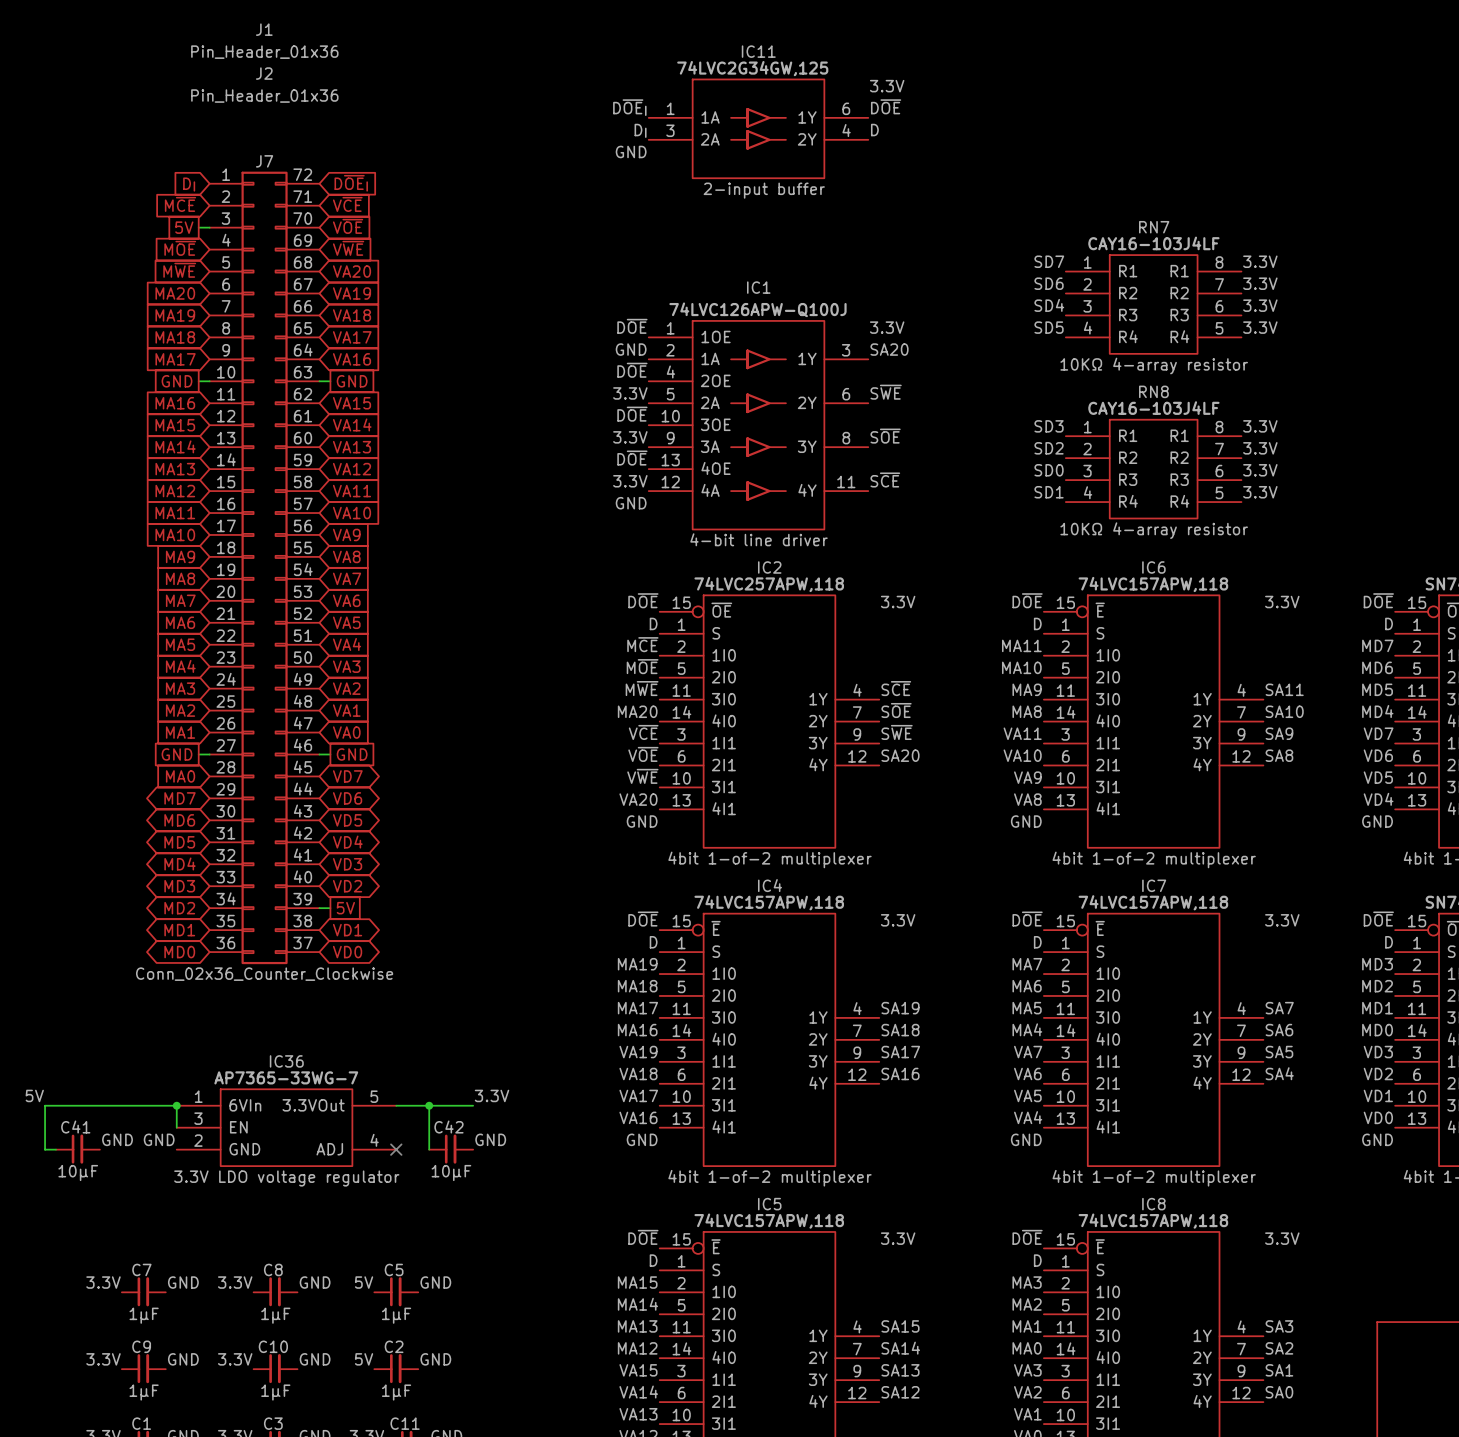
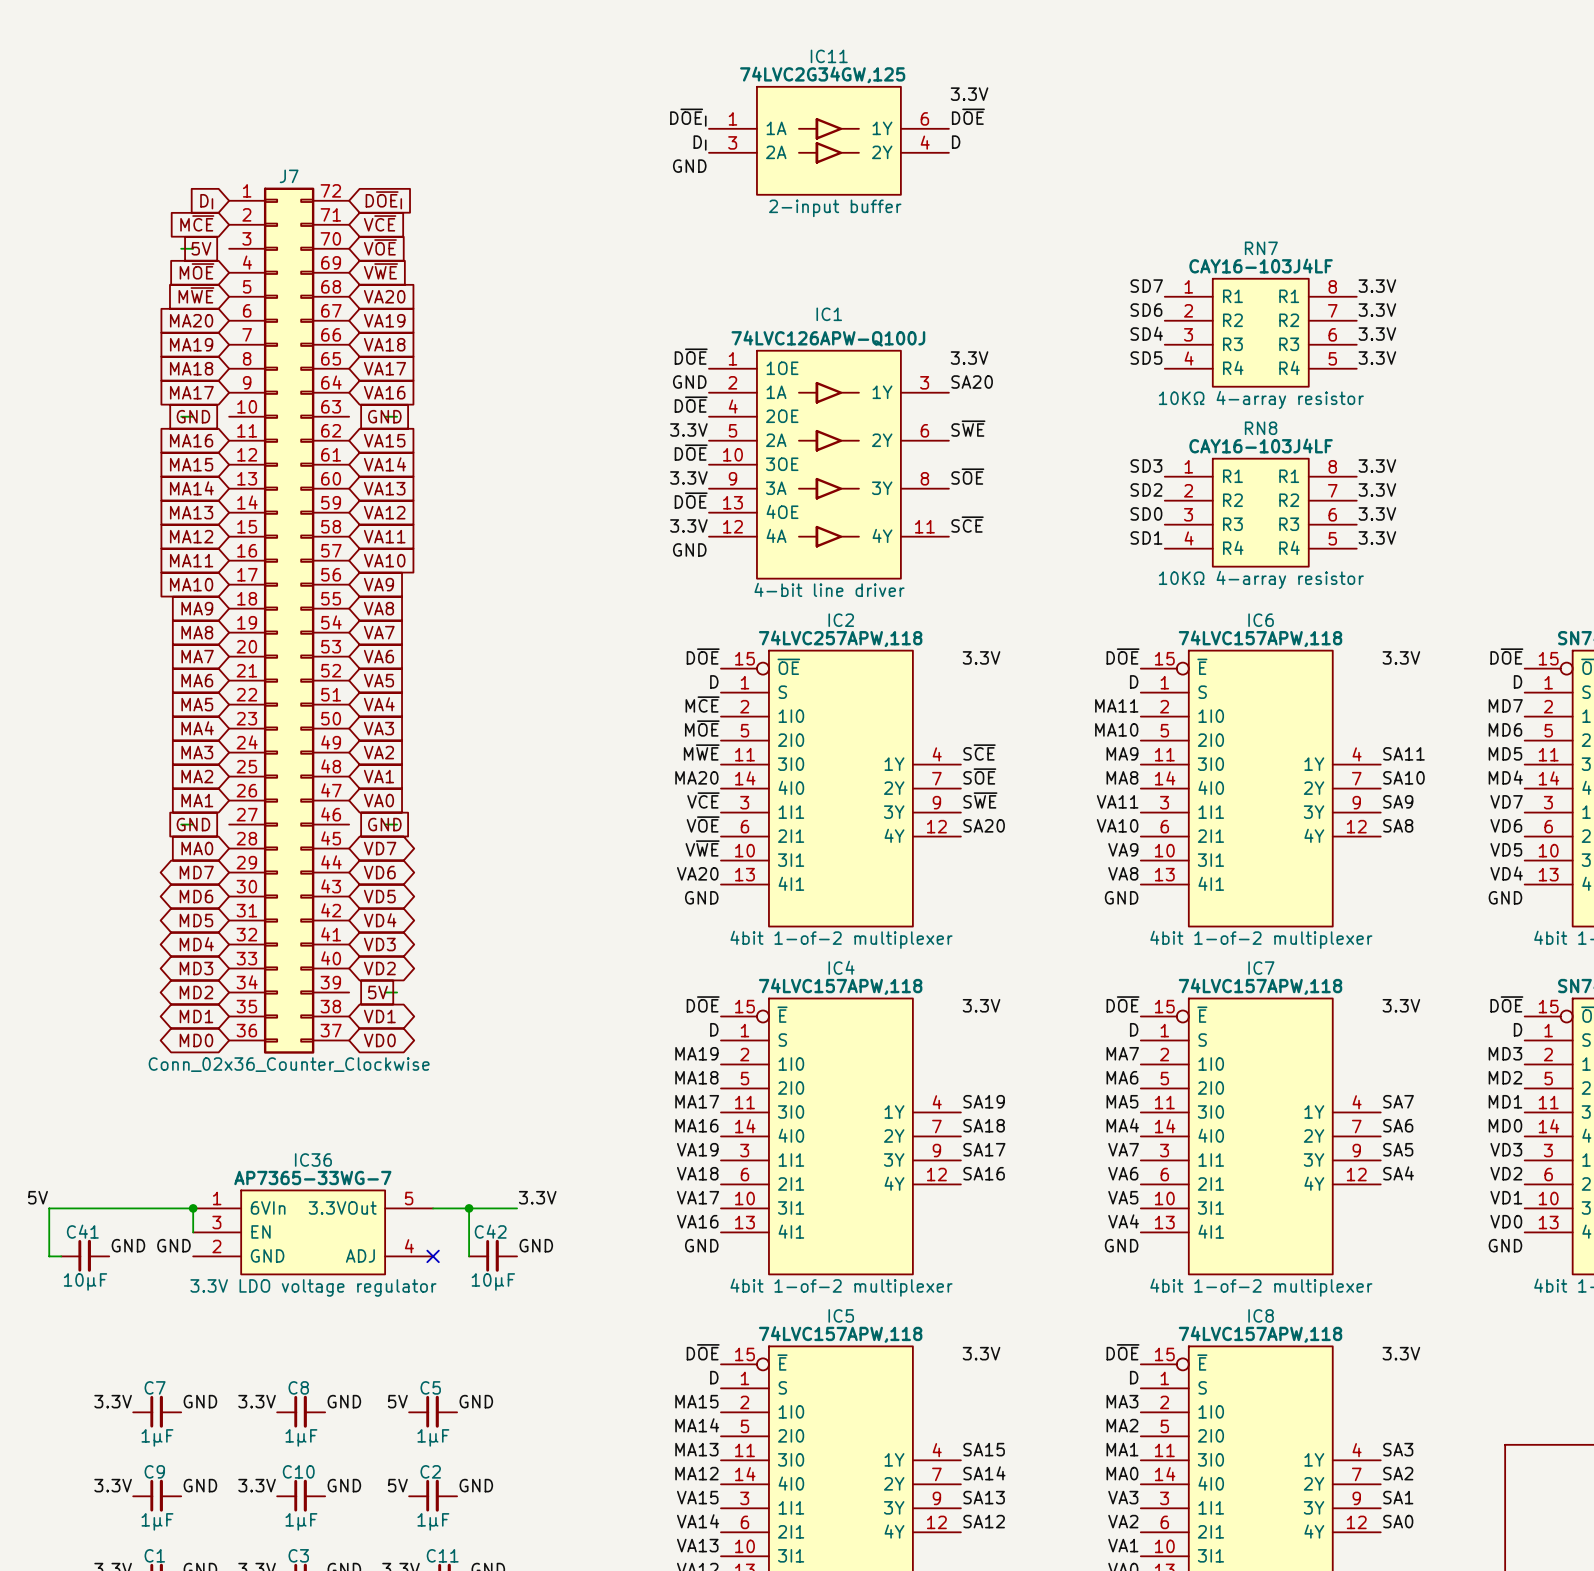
J1: Pin_Header_01x36 (264, 41) -> none
J2: Pin_Header_01x36 (264, 85) -> none
wire: (198, 227) (209, 227) -> (181, 248) (193, 248)
wire: (198, 381) (209, 381) -> (181, 416) (193, 416)
wire: (319, 381) (330, 381) -> (385, 416) (397, 416)
wire: (198, 754) (209, 754) -> (181, 824) (193, 824)
wire: (319, 754) (330, 754) -> (385, 824) (397, 824)
wire: (319, 908) (330, 908) -> (385, 992) (397, 992)

